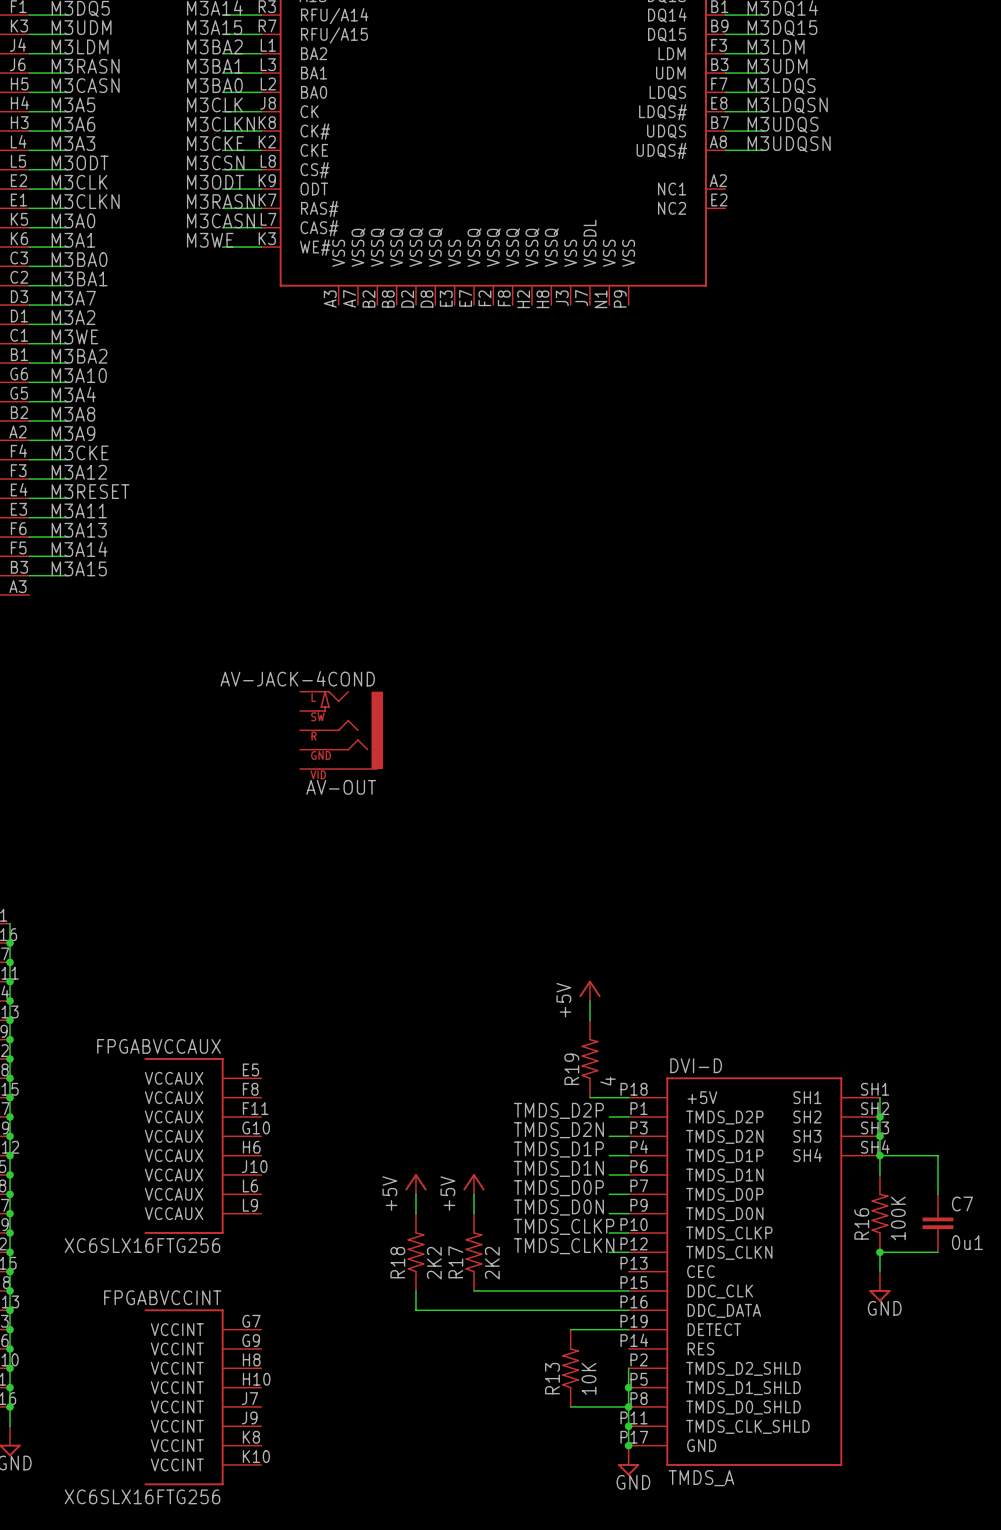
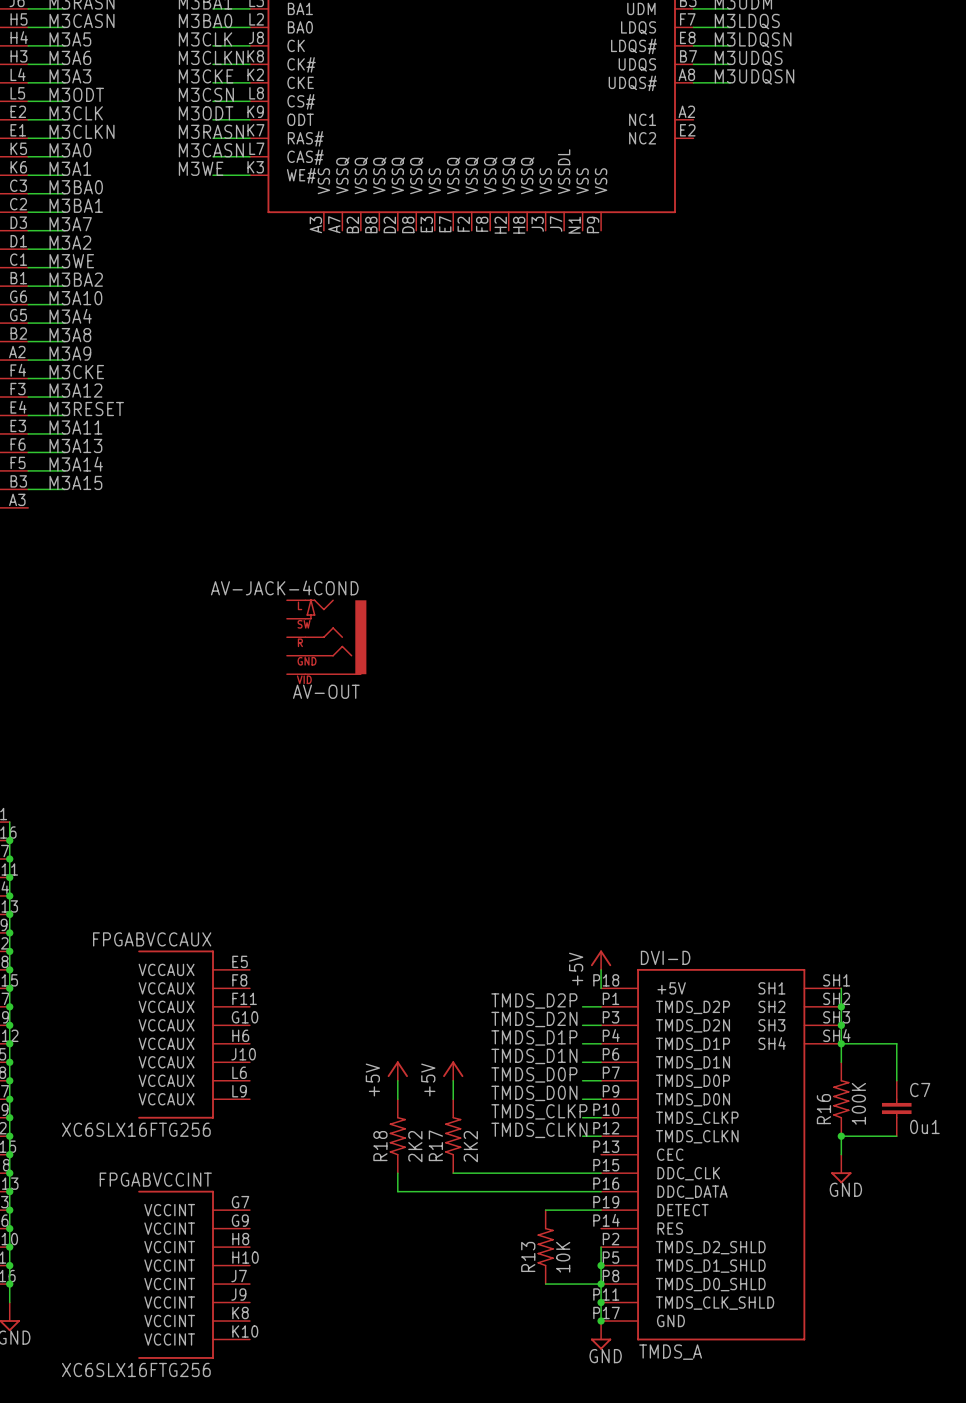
power symbol position: +5V (589, 990) -> +5V (601, 960)
wire: (589, 1000) (589, 1020) -> none
R19: 4 (589, 1058) -> none
wire: (589, 1097) (628, 1097) -> (601, 969) (601, 988)

